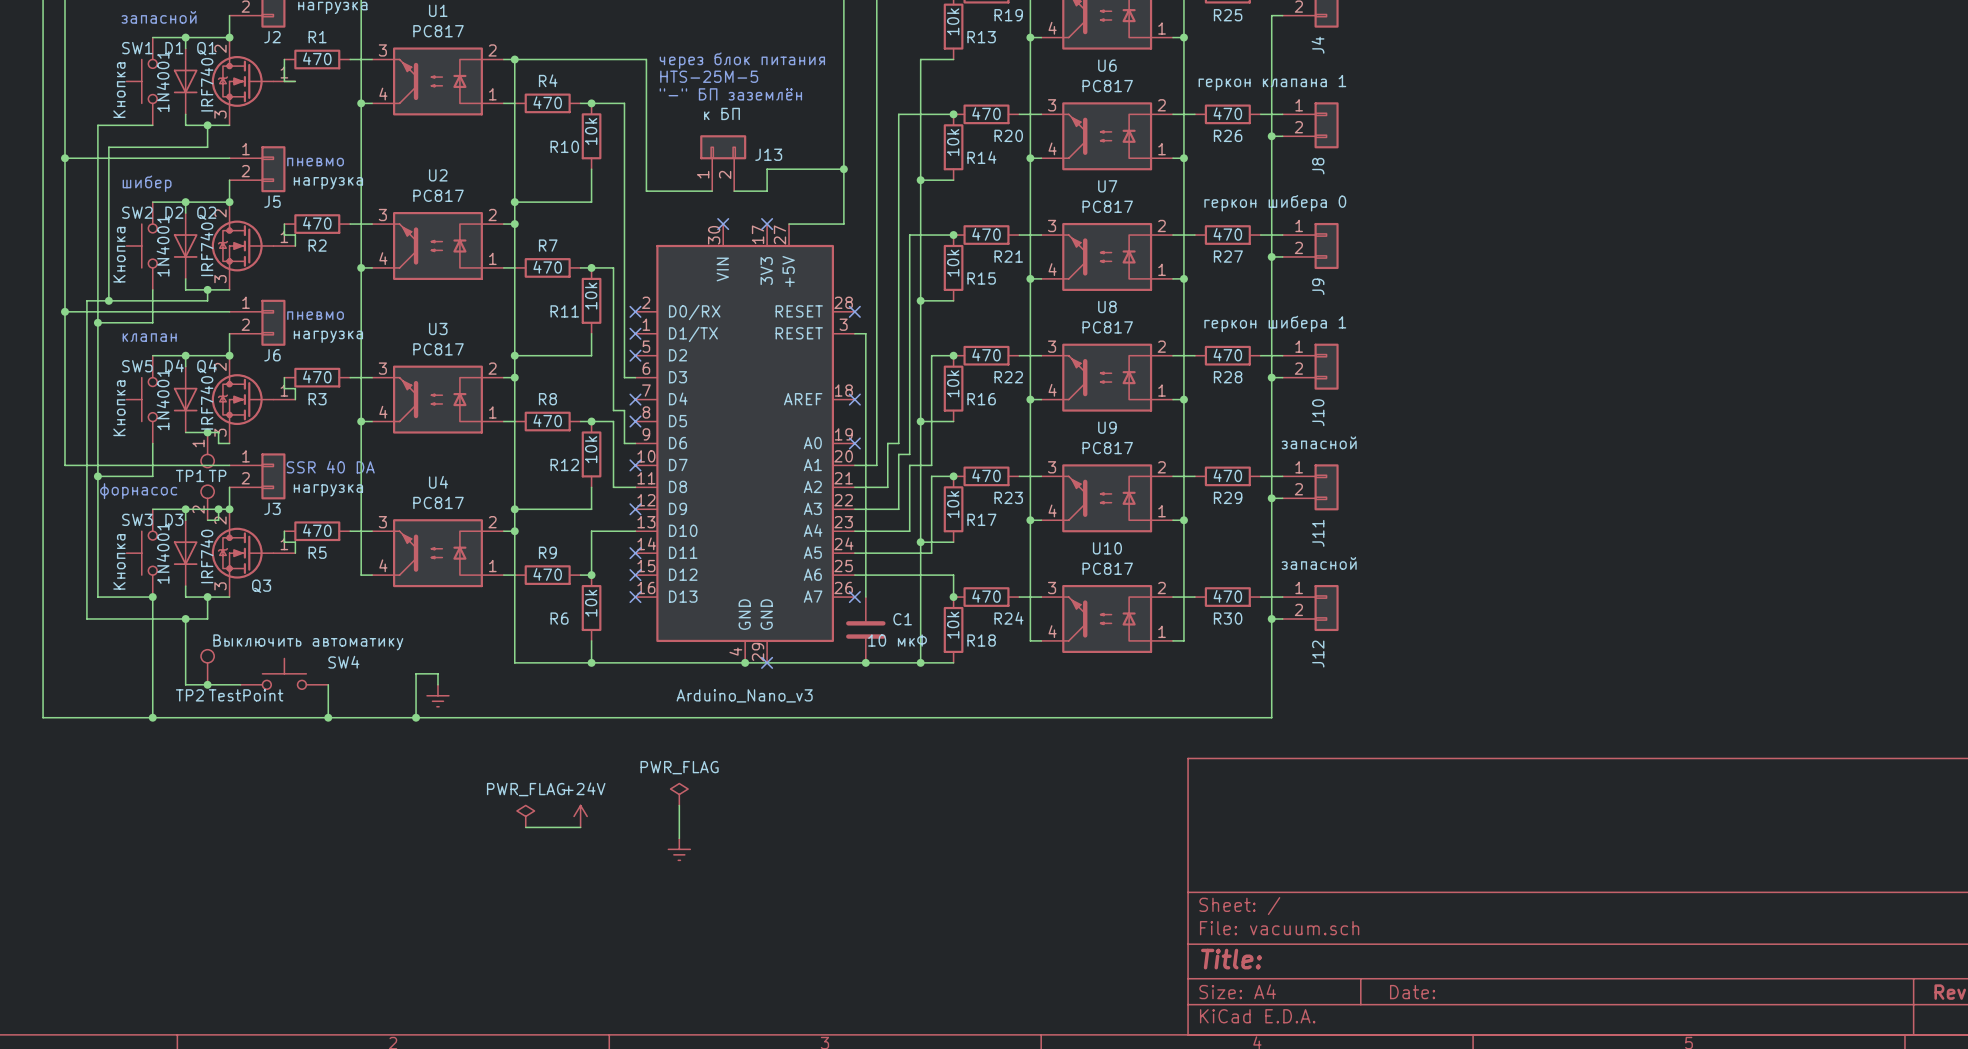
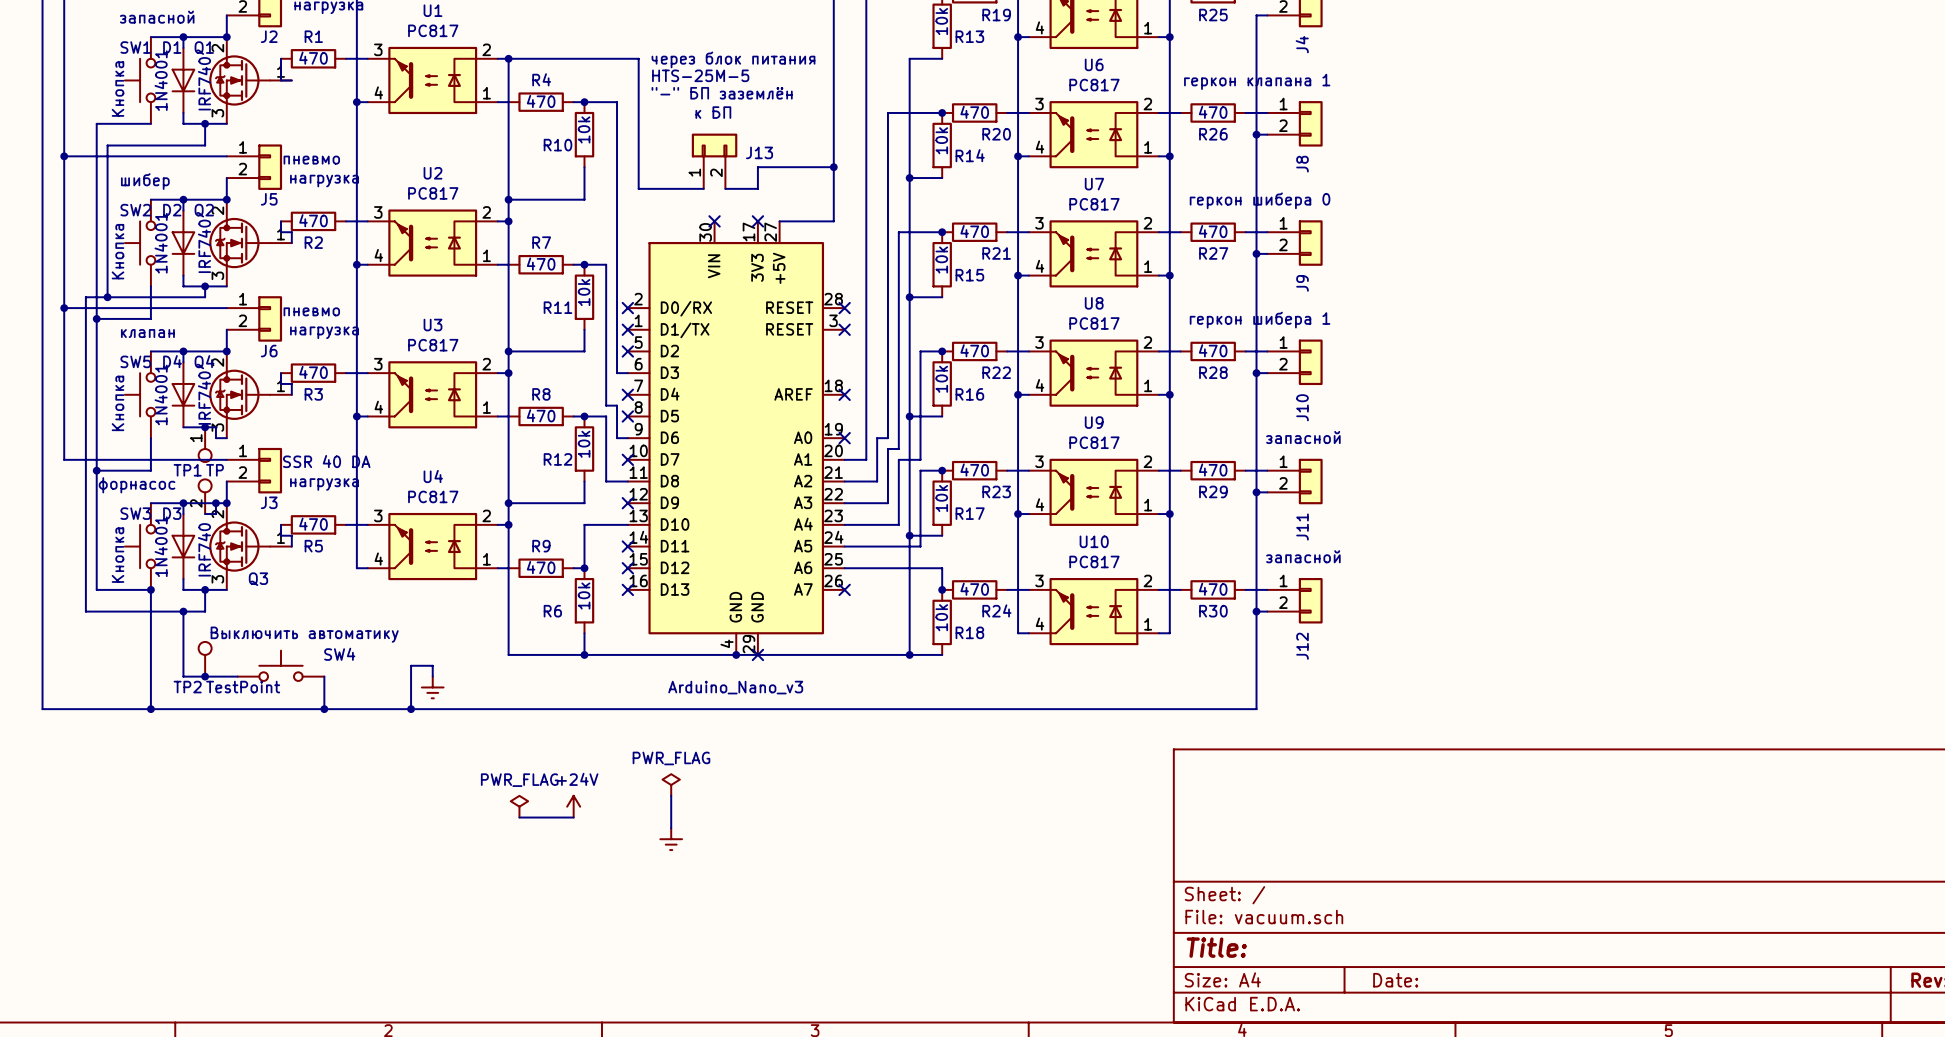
wire: (854, 333) (865, 333) (865, 597) -> none
no-connect mark: none -> (844, 329)
C1: 10 мкФ (865, 629) -> none
junction: (865, 662) -> none

